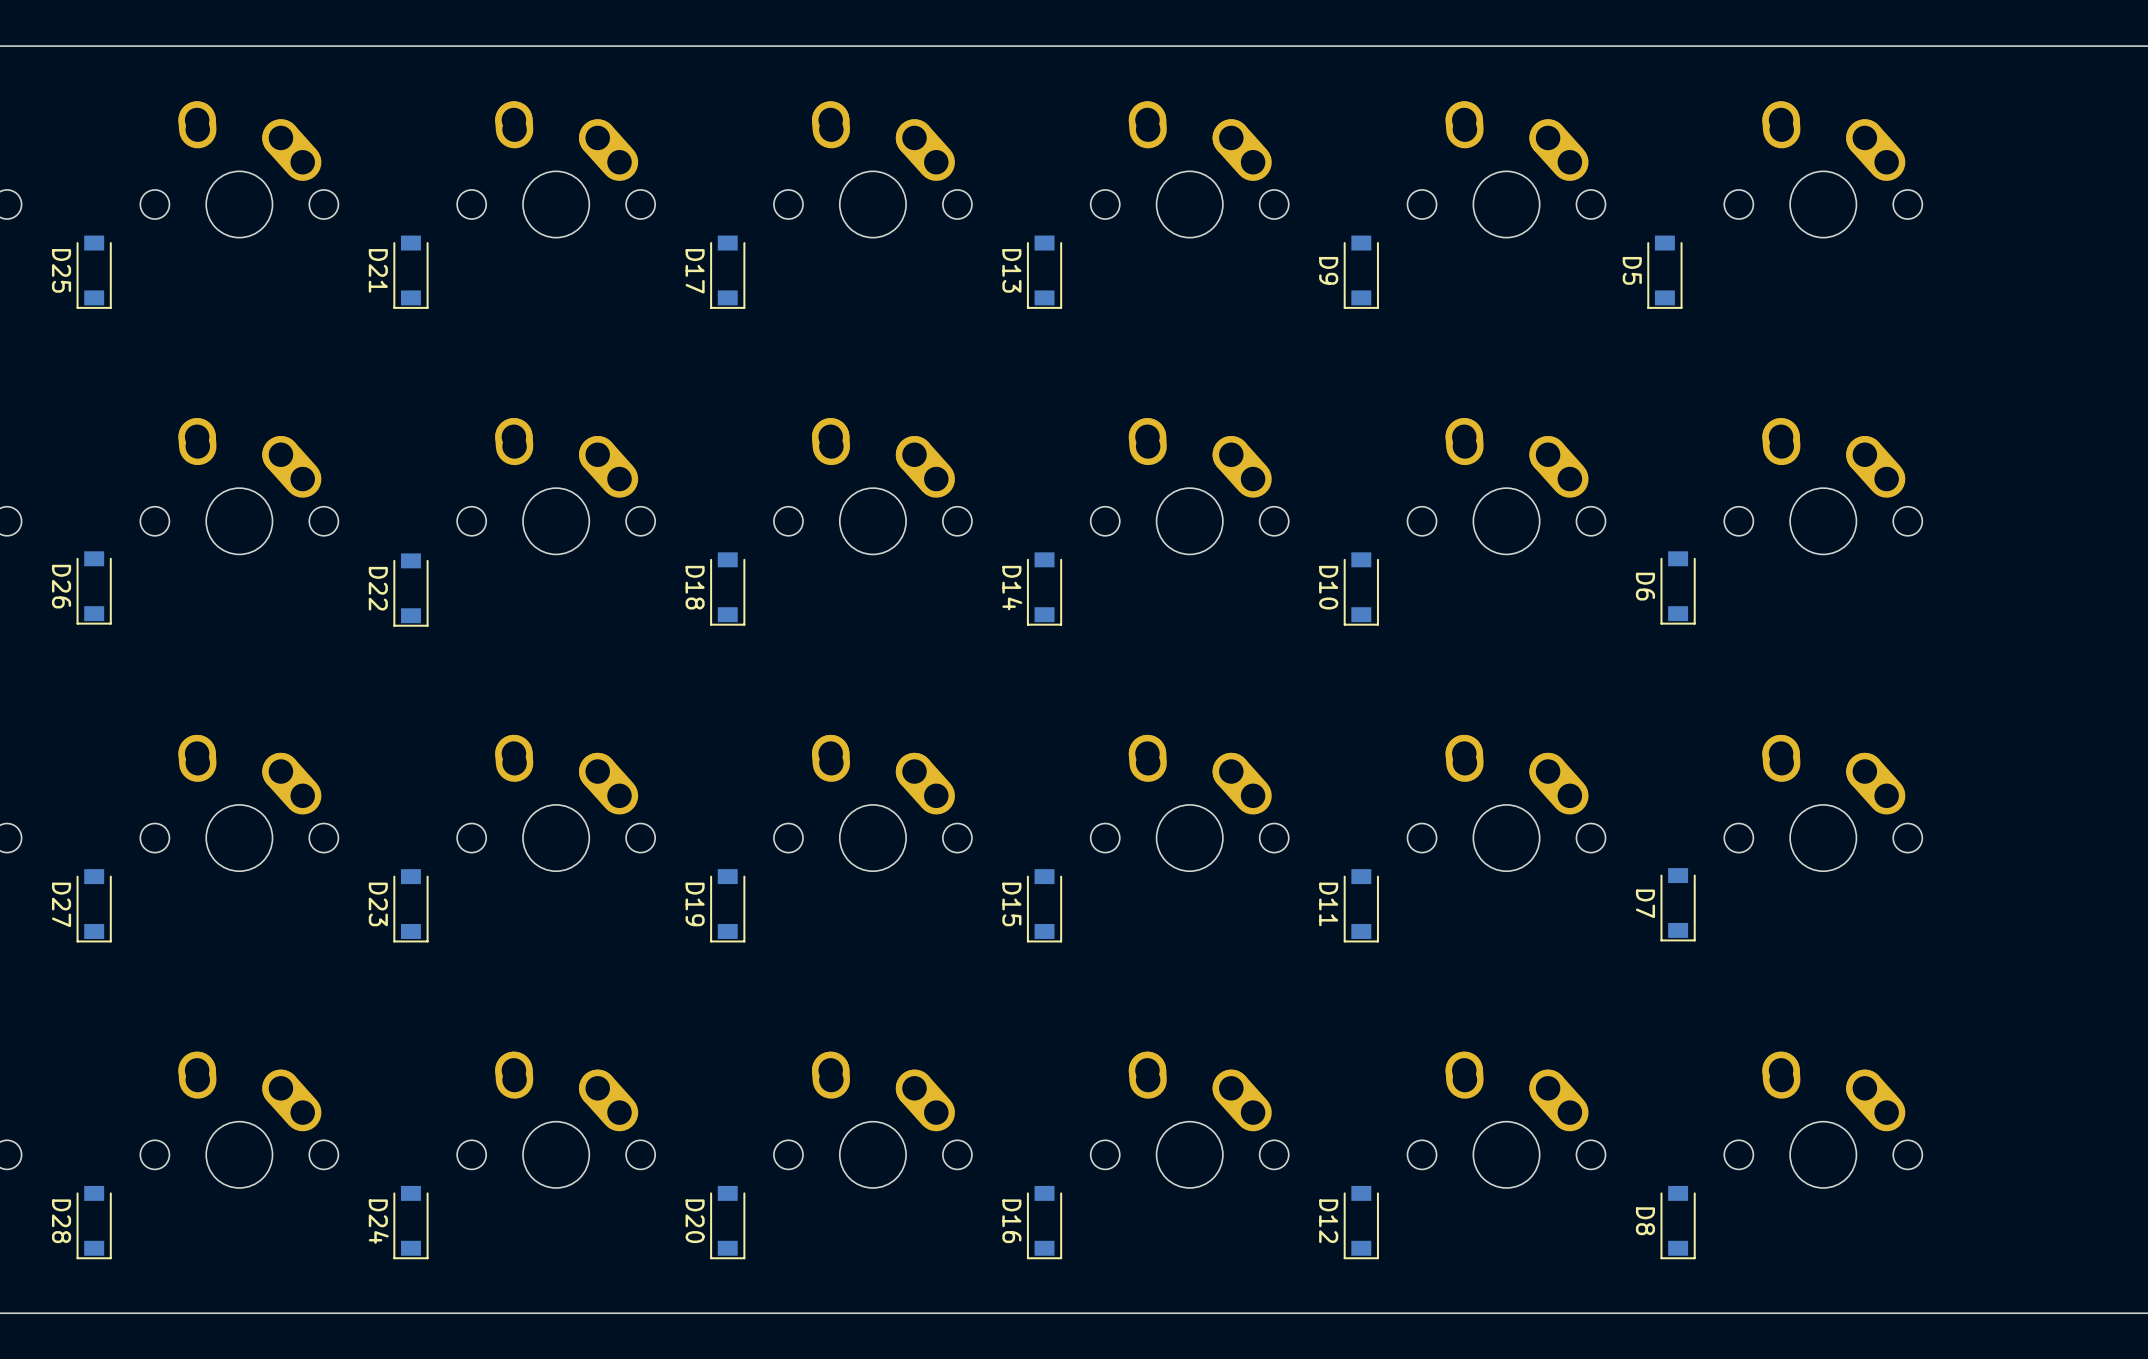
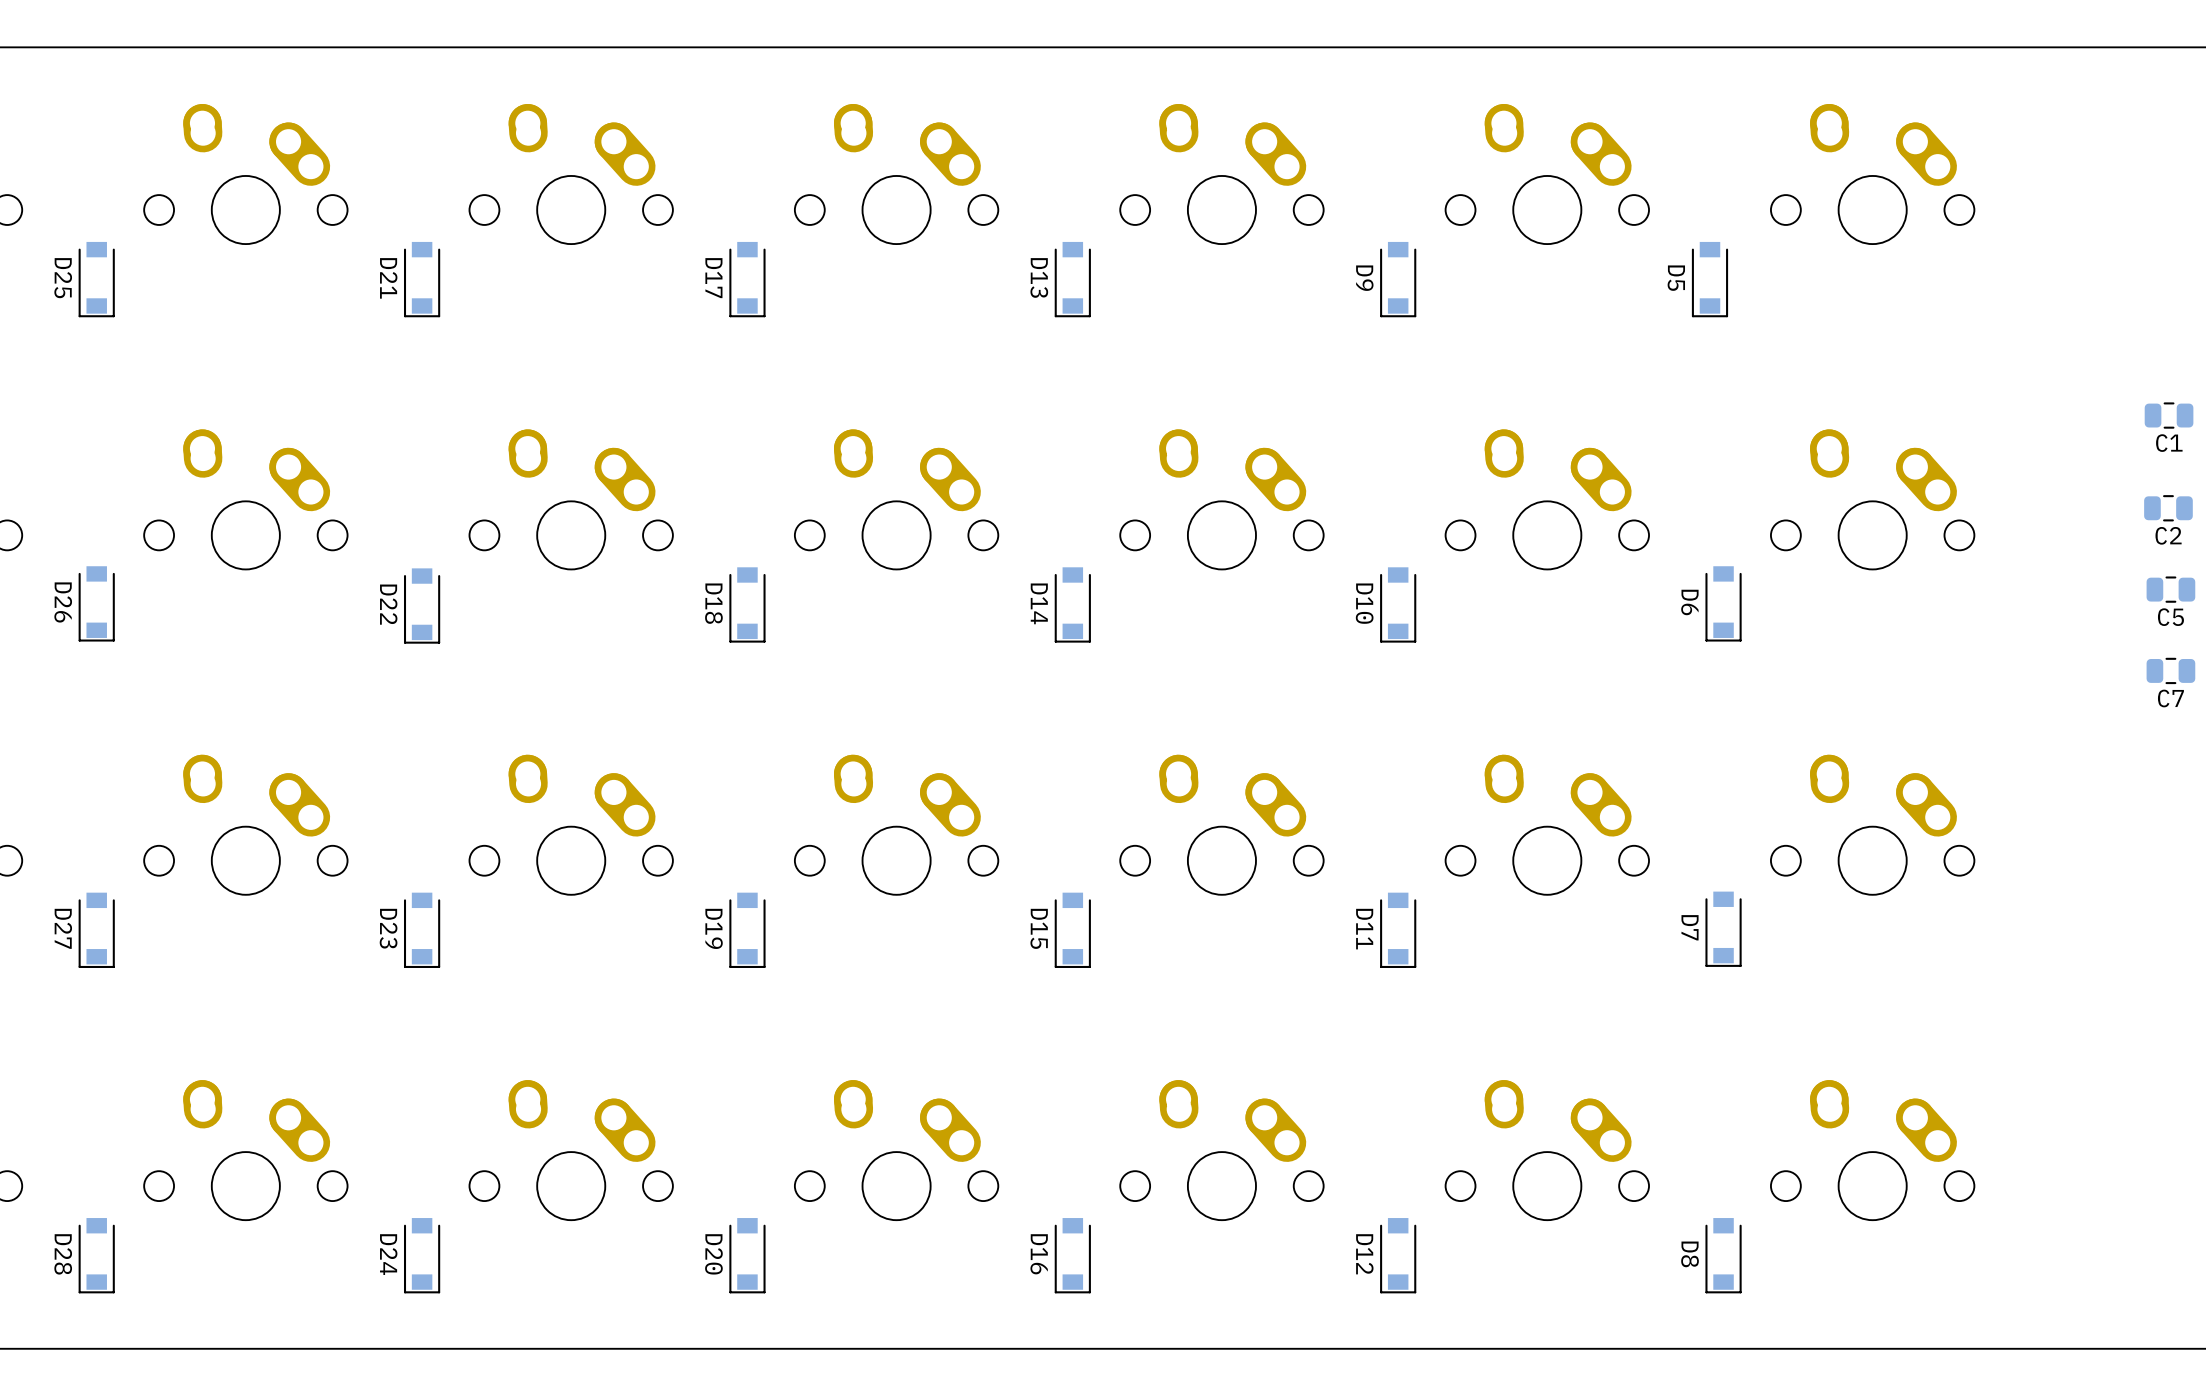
C1: none -> (2169, 415)
C2: none -> (2168, 508)
C5: none -> (2170, 589)
C7: none -> (2170, 670)

